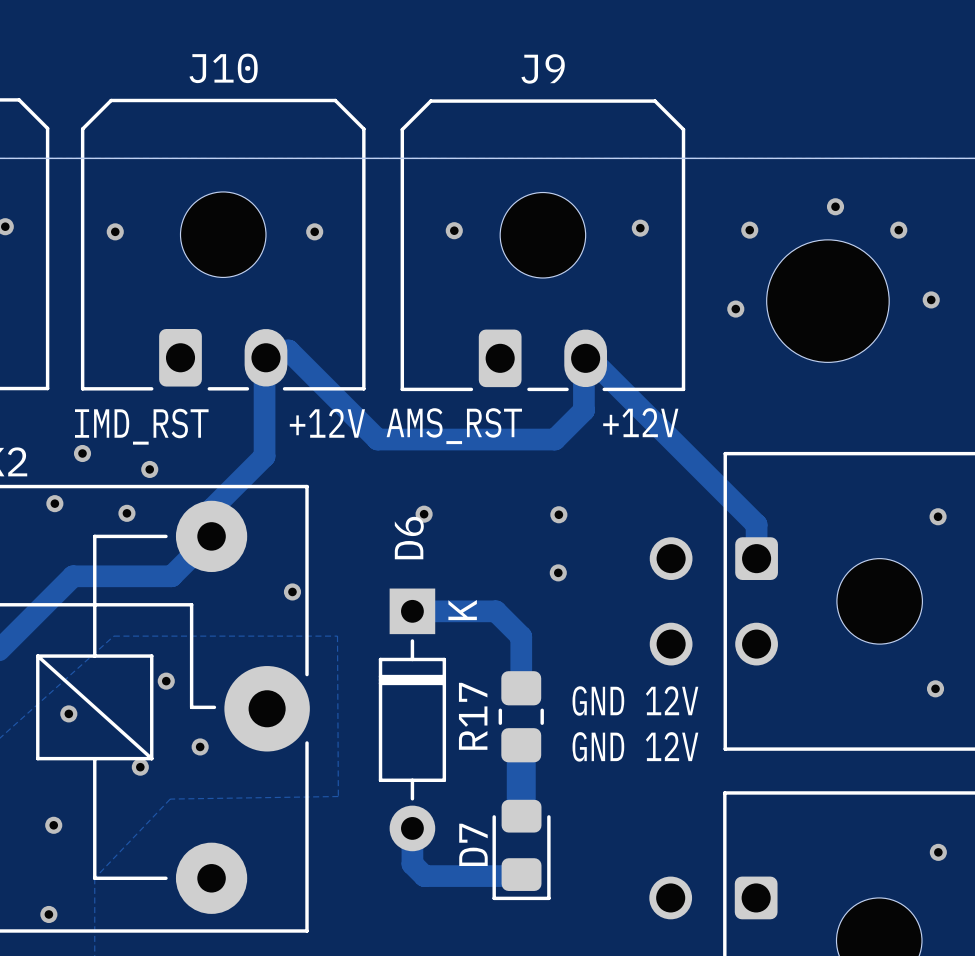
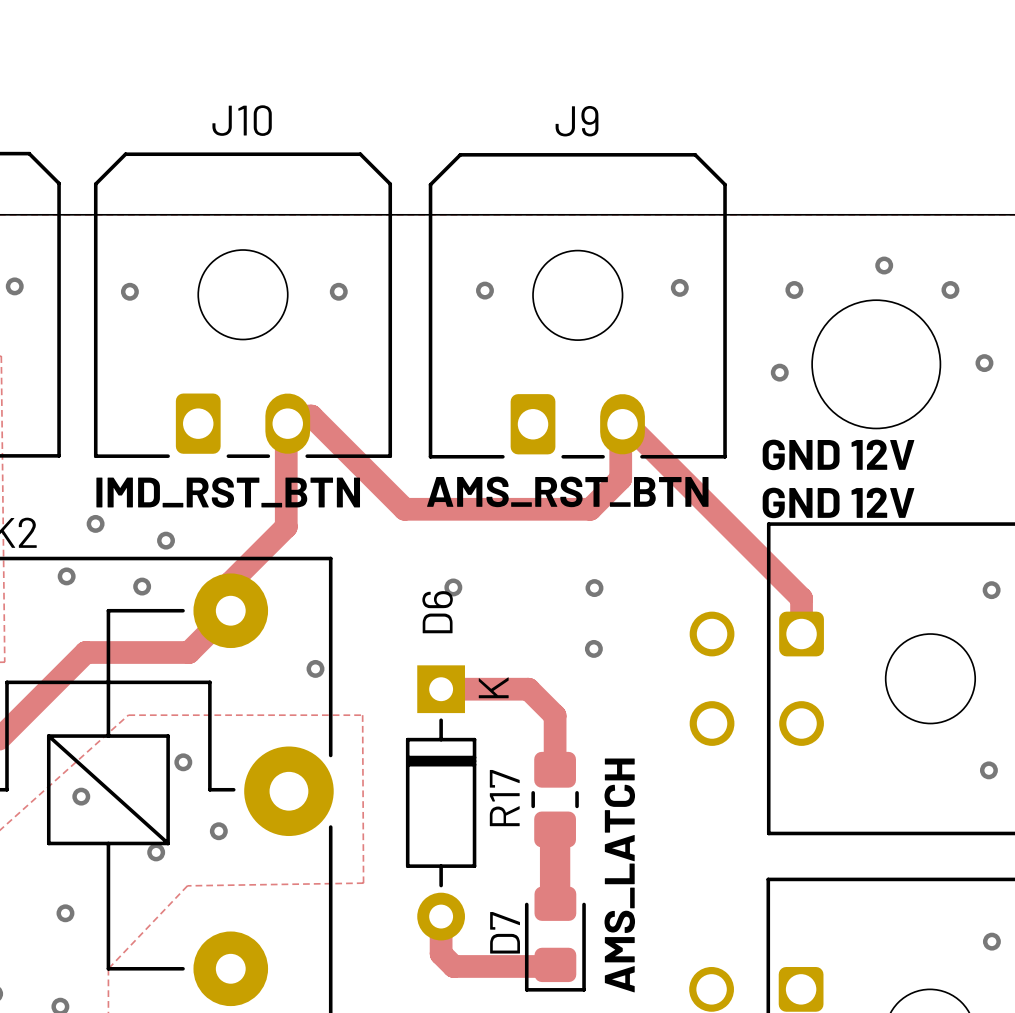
text: none -> GND 12V (838, 454)
text: IMD_RST +12V (219, 426) -> IMD_RST_BTN (228, 492)
text: AMS_RST +12V (532, 426) -> AMS_RST_BTN (567, 491)
text: none -> GND 12V (838, 502)
text: GND 12V (635, 701) -> none
text: GND 12V (635, 746) -> none
text: none -> AMS_LATCH (619, 875)

